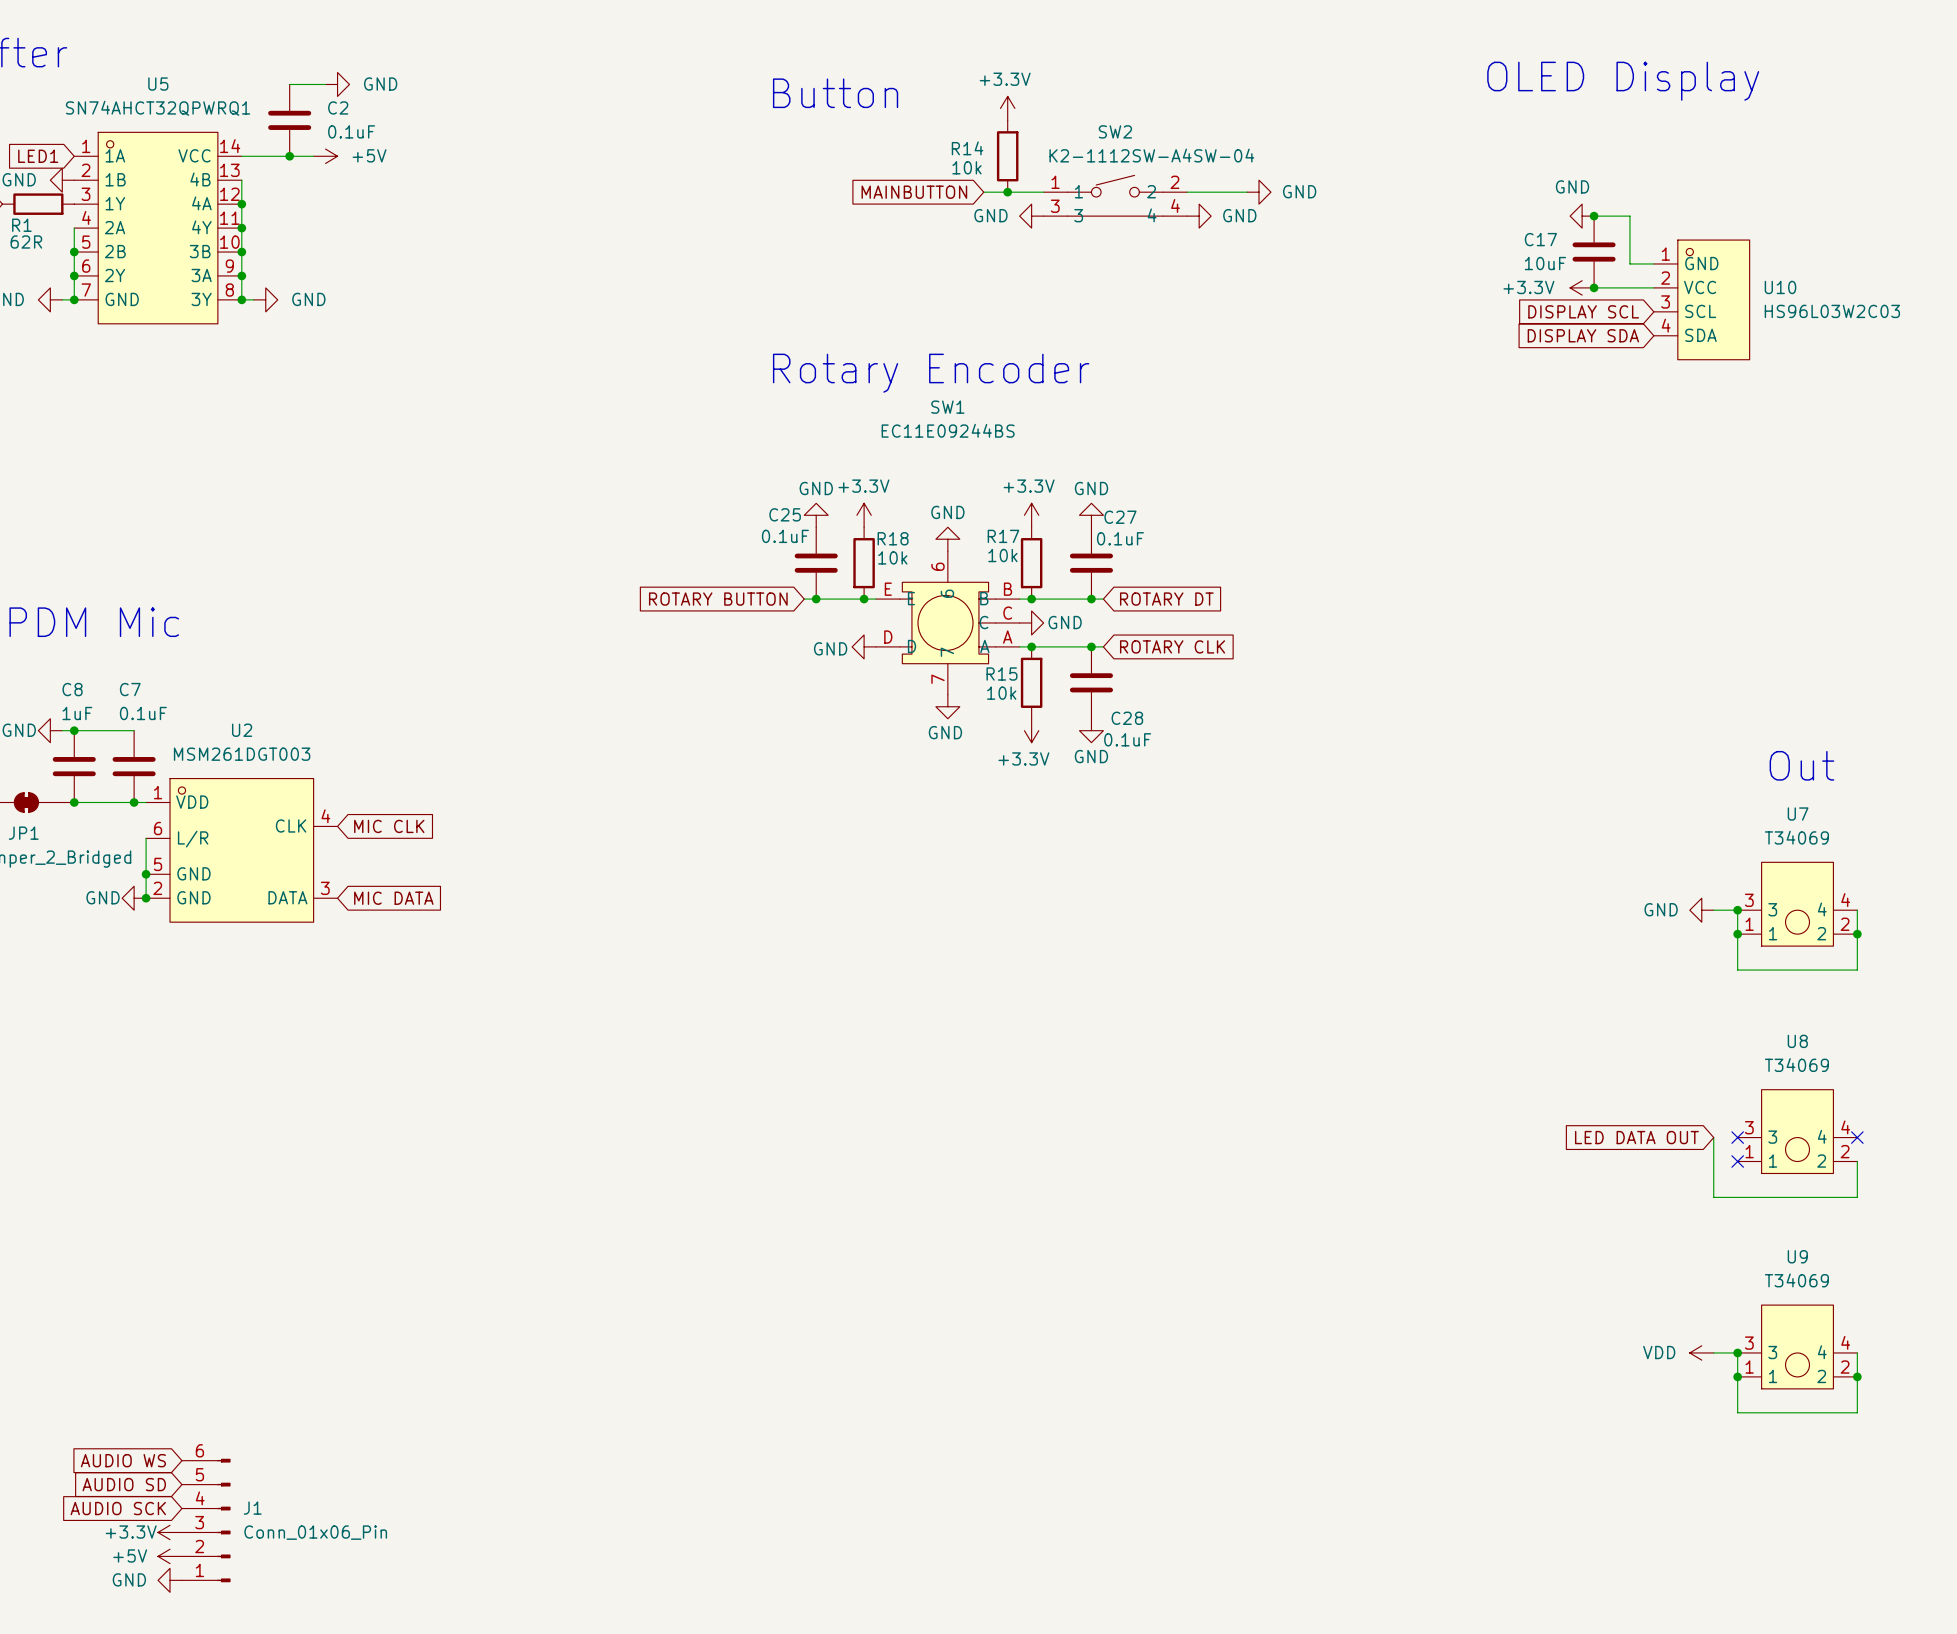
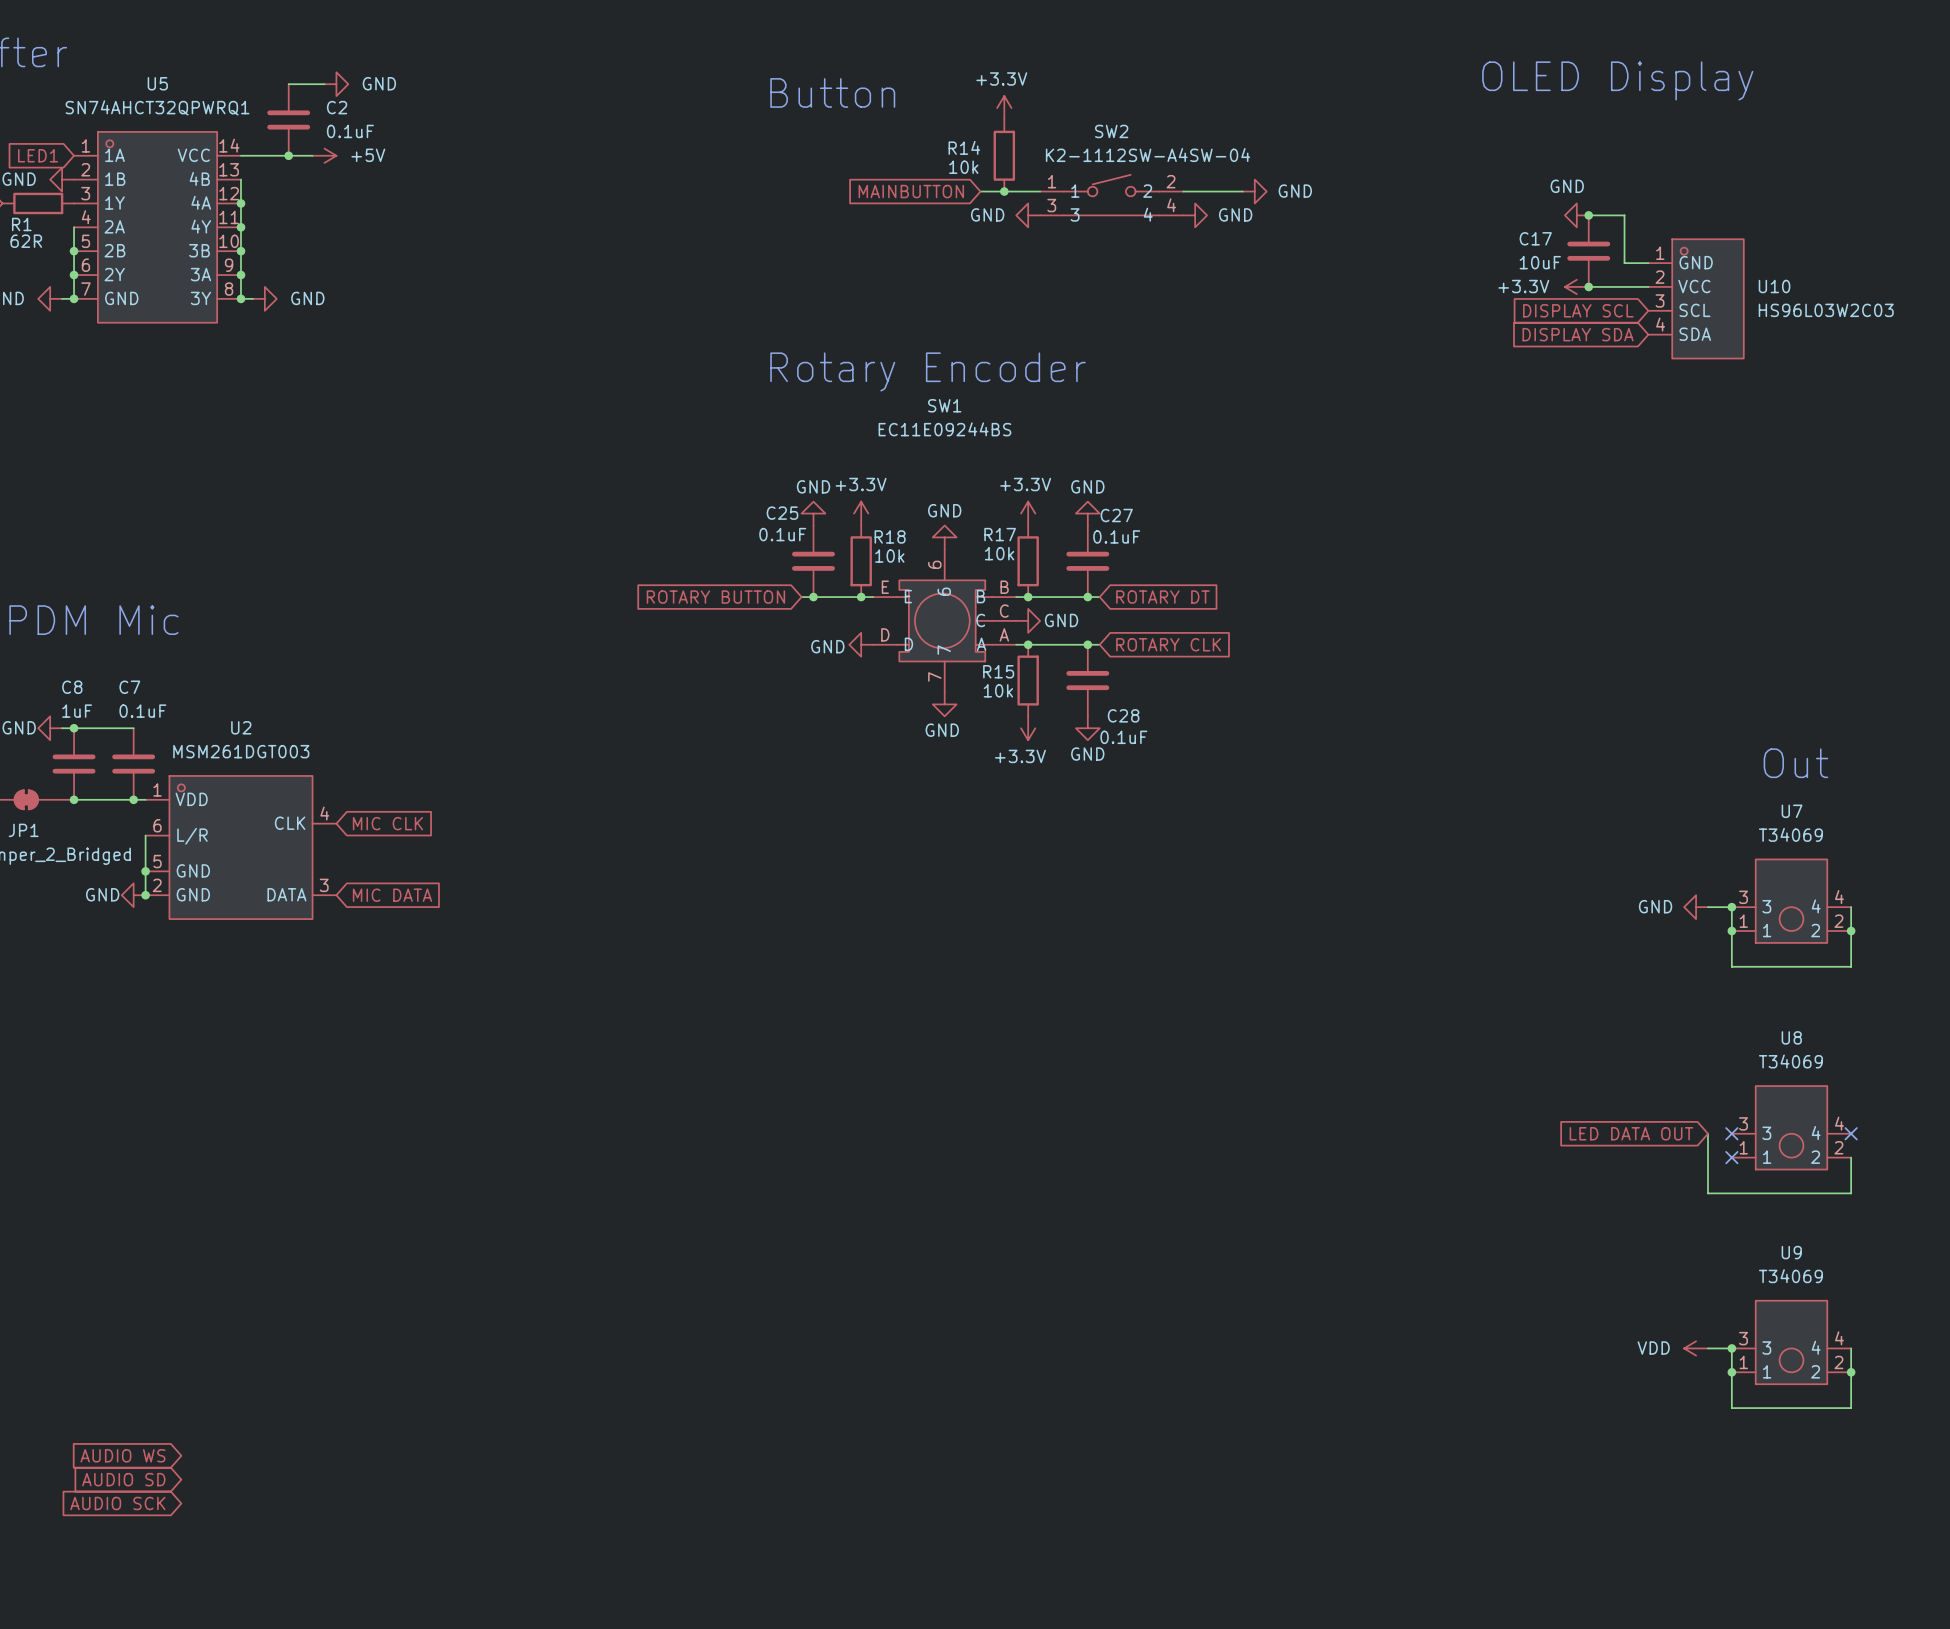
J1: Conn_01x06_Pin (206, 1520) -> none
power symbol: +3.3V (170, 1532) -> none
power symbol: +5V (170, 1556) -> none
power symbol: GND (170, 1580) -> none

